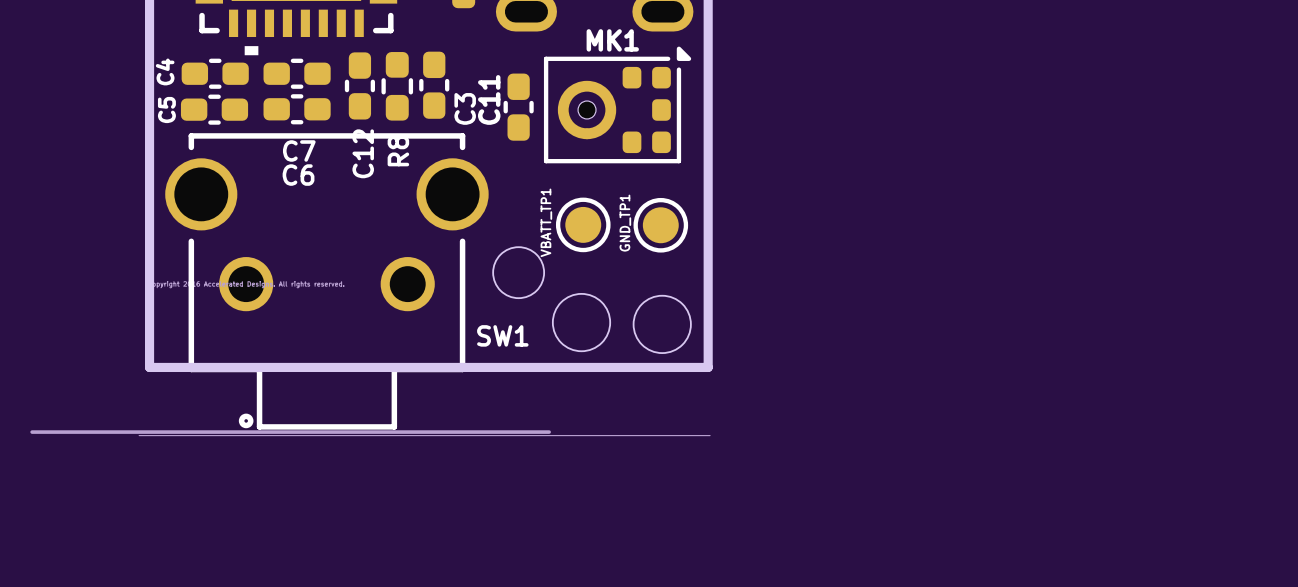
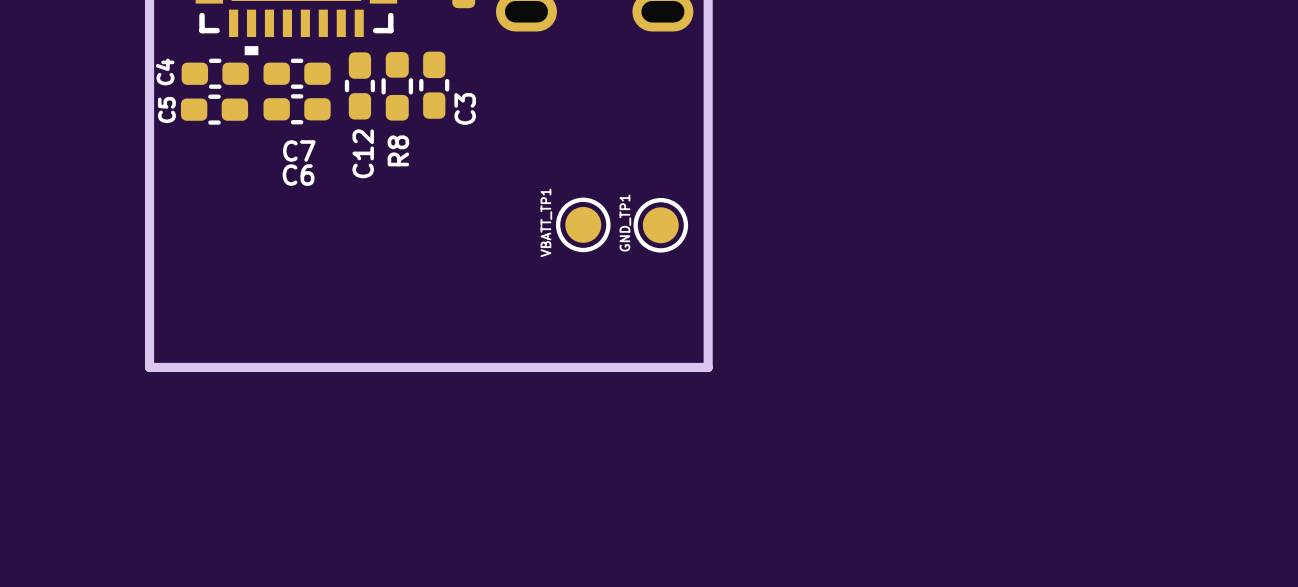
MK1: (617, 104) -> none
C11: (518, 107) -> none
round board edge: [492, 246, 546, 300] -> none
SW1: (326, 281) -> none
round board edge: [551, 293, 612, 353] -> none
round board edge: [632, 294, 692, 354] -> none
line: (32, 432) (549, 432) -> none
line: (139, 435) (710, 435) -> none

